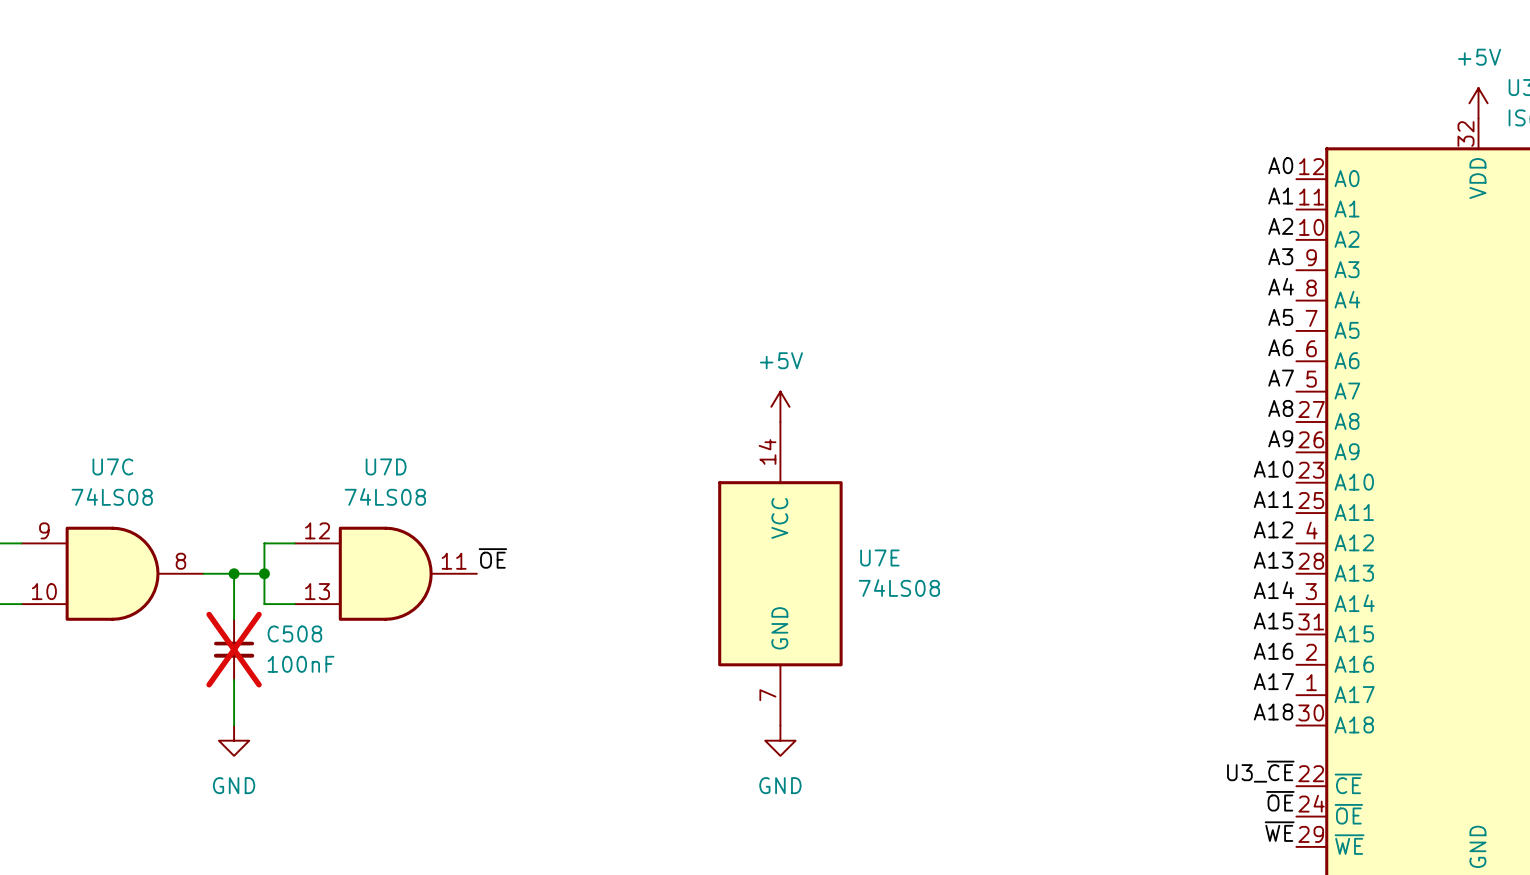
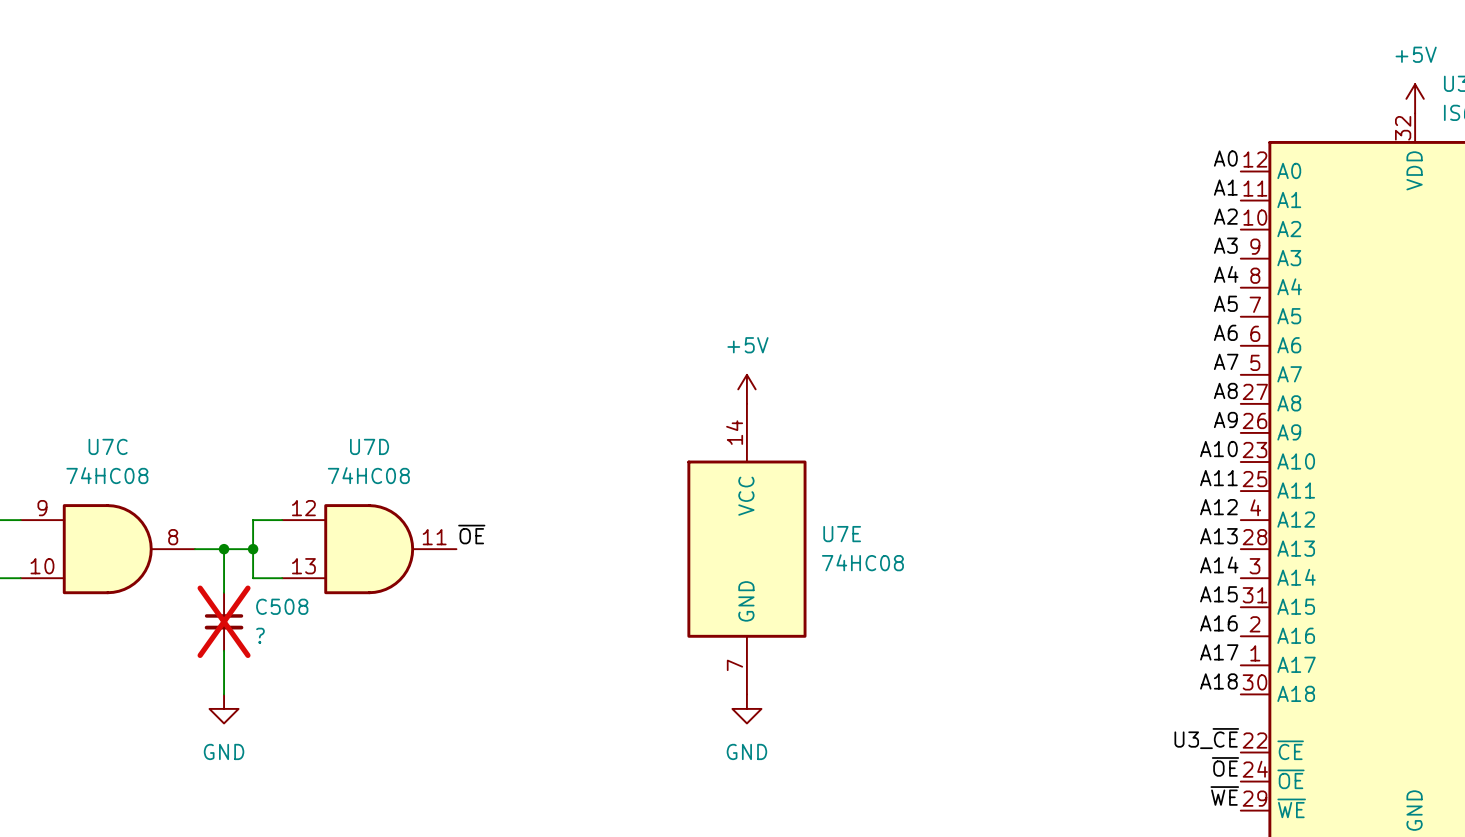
U7C value: 74LS08 (112, 496) -> 74HC08 (107, 475)
U7D value: 74LS08 (385, 496) -> 74HC08 (368, 475)
U7E value: 74LS08 (899, 588) -> 74HC08 (862, 562)
C508 value: 100nF (301, 664) -> ? (260, 635)

